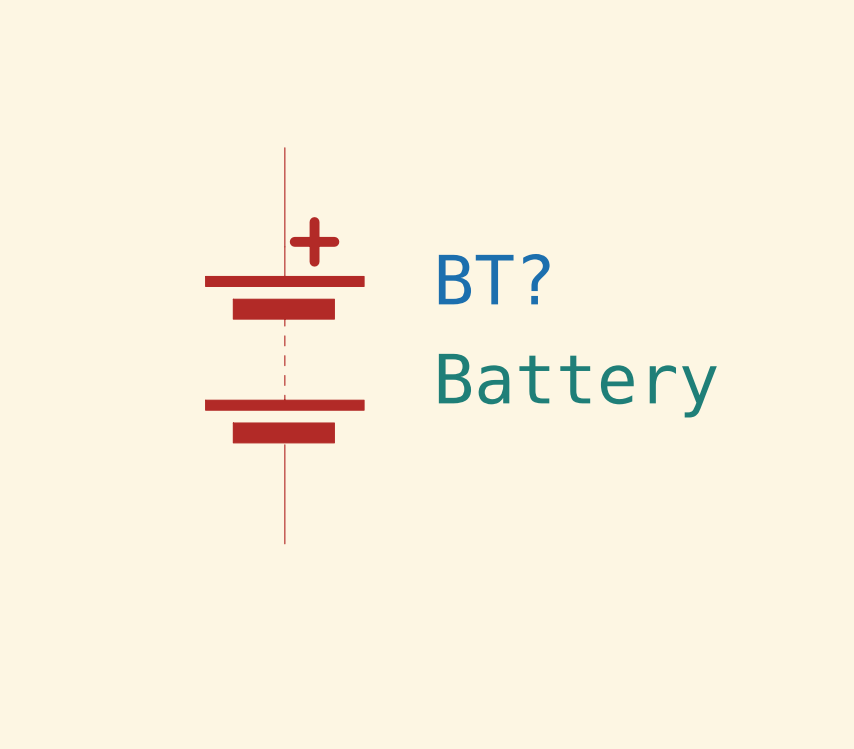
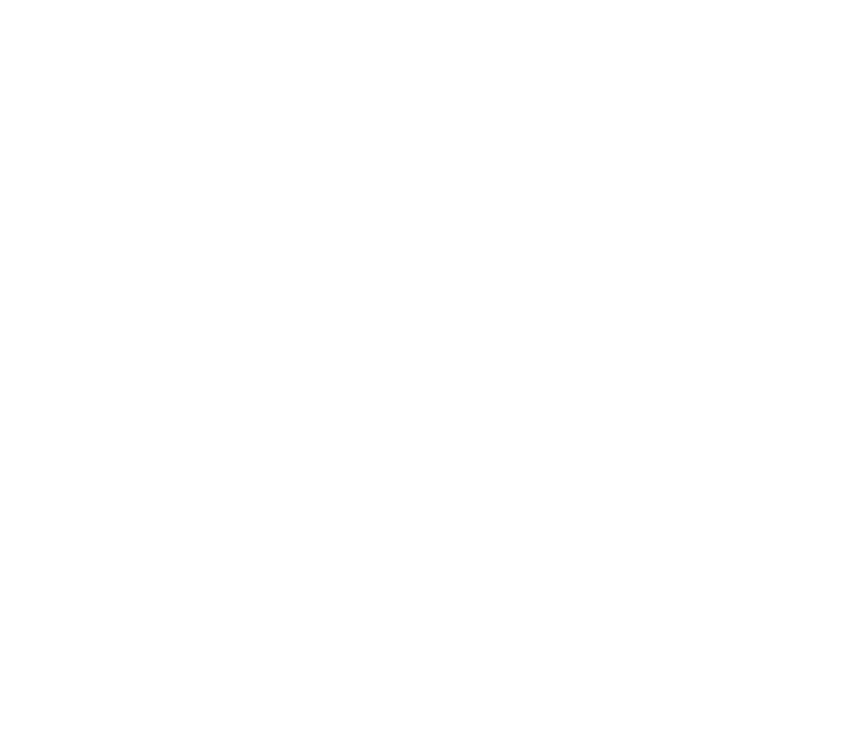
BT?: Battery (284, 345) -> none

